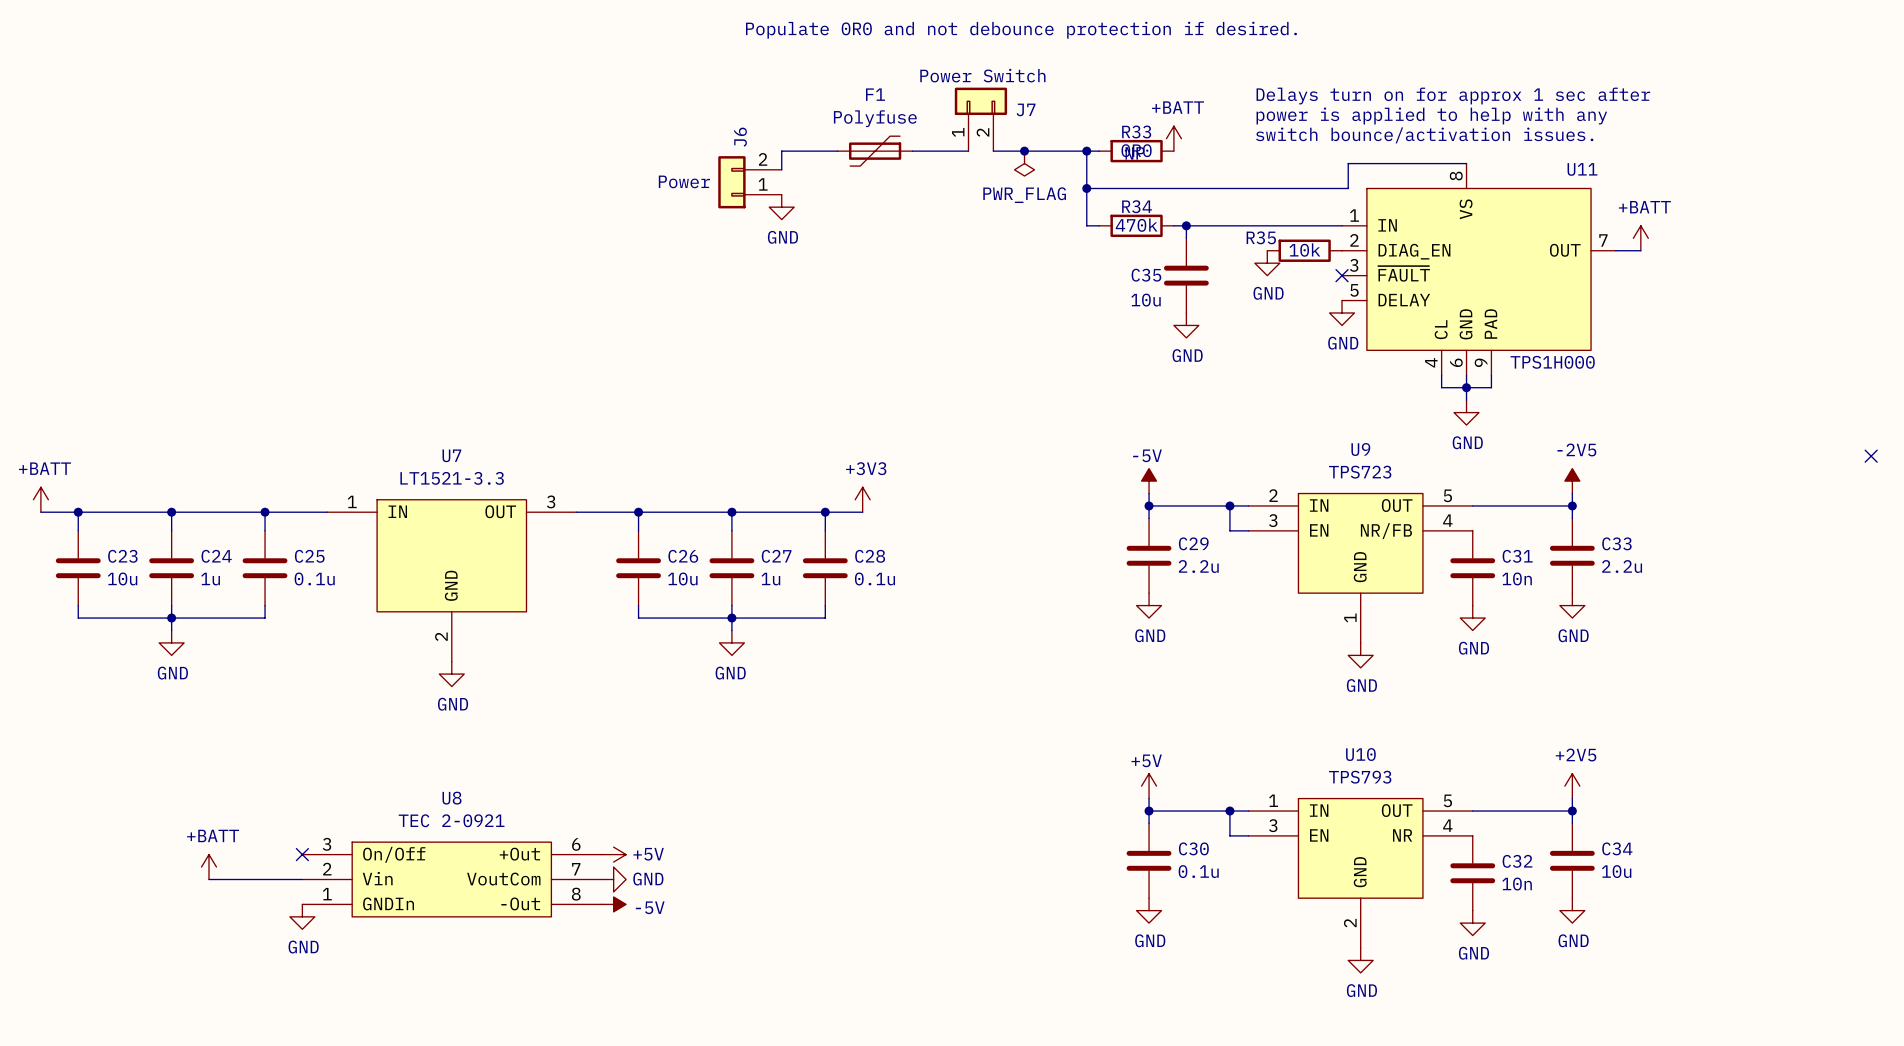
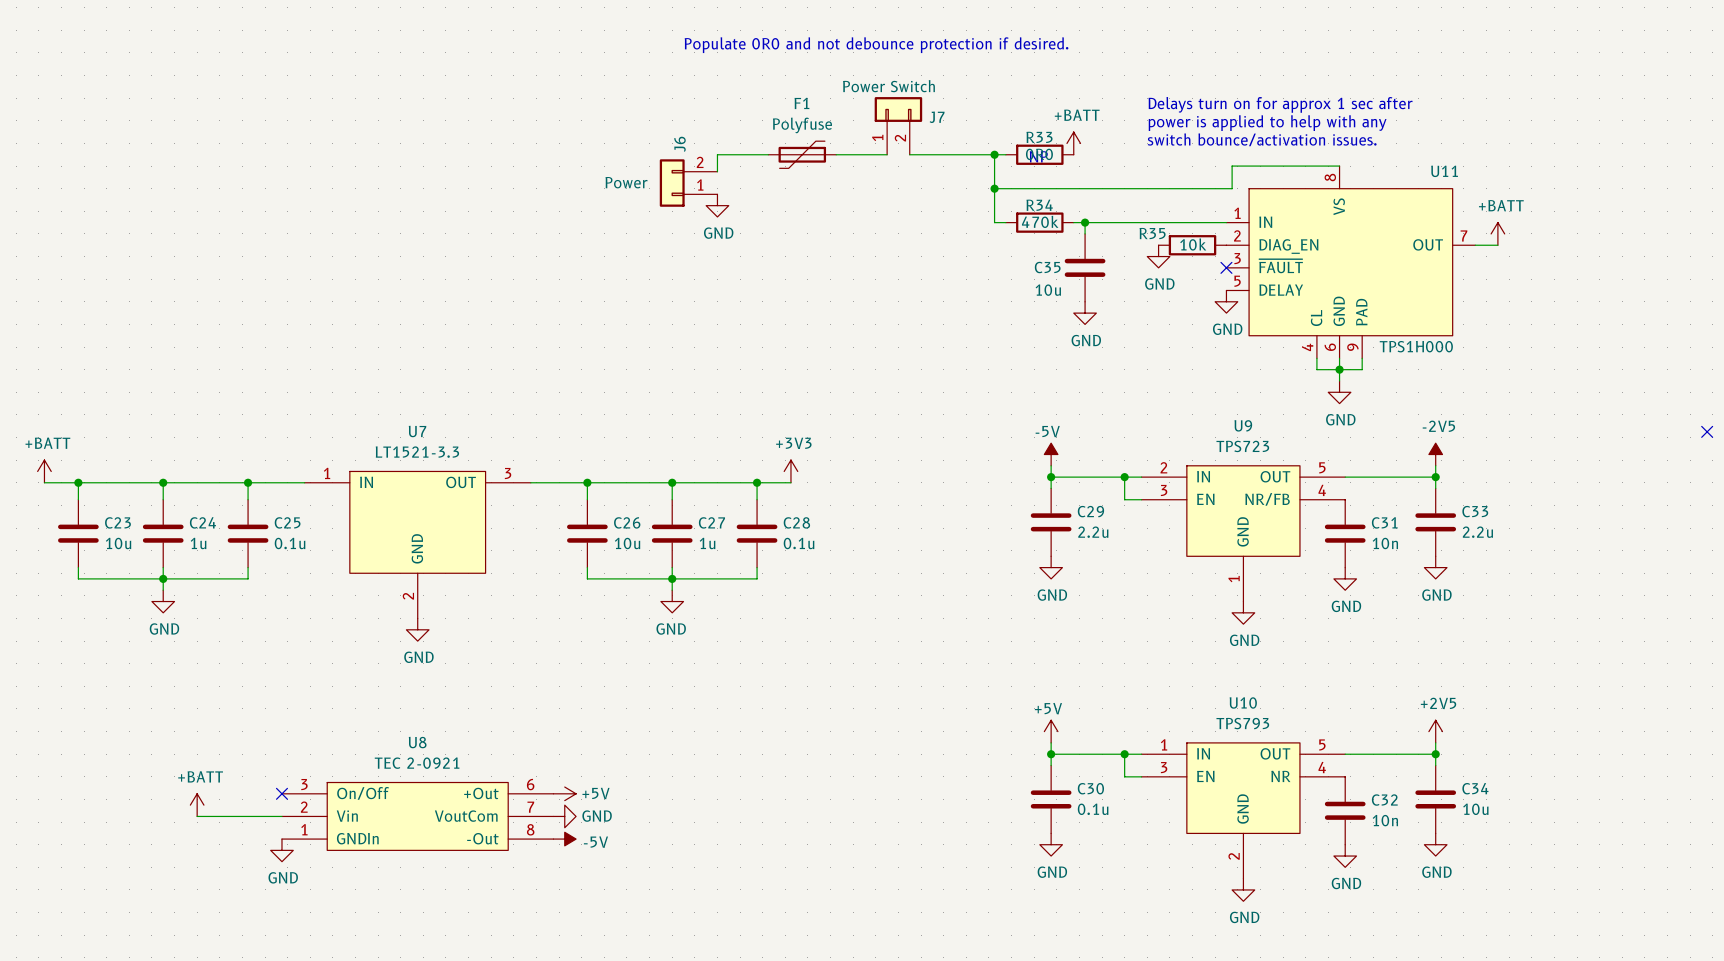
junction: (1024, 151) -> none
power symbol: PWR_FLAG (1024, 163) -> none

